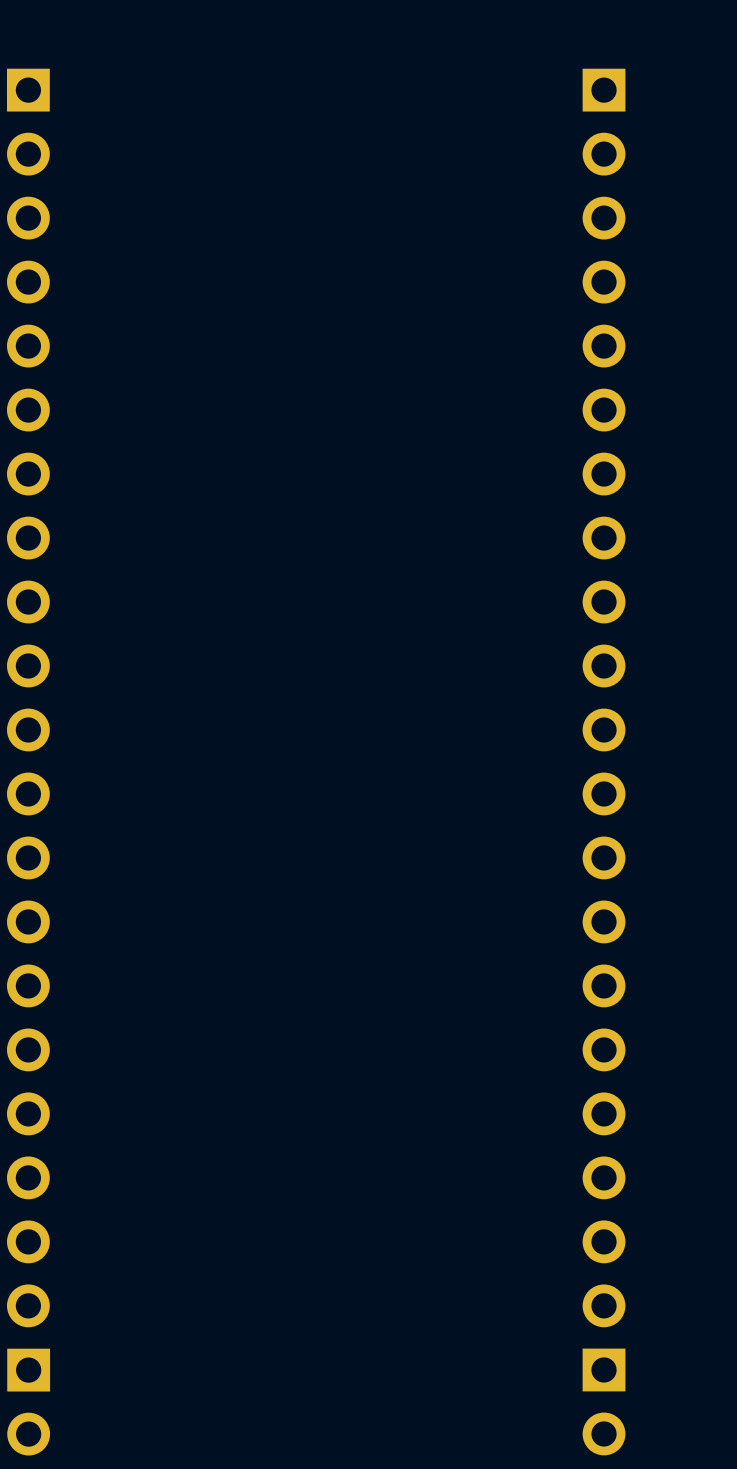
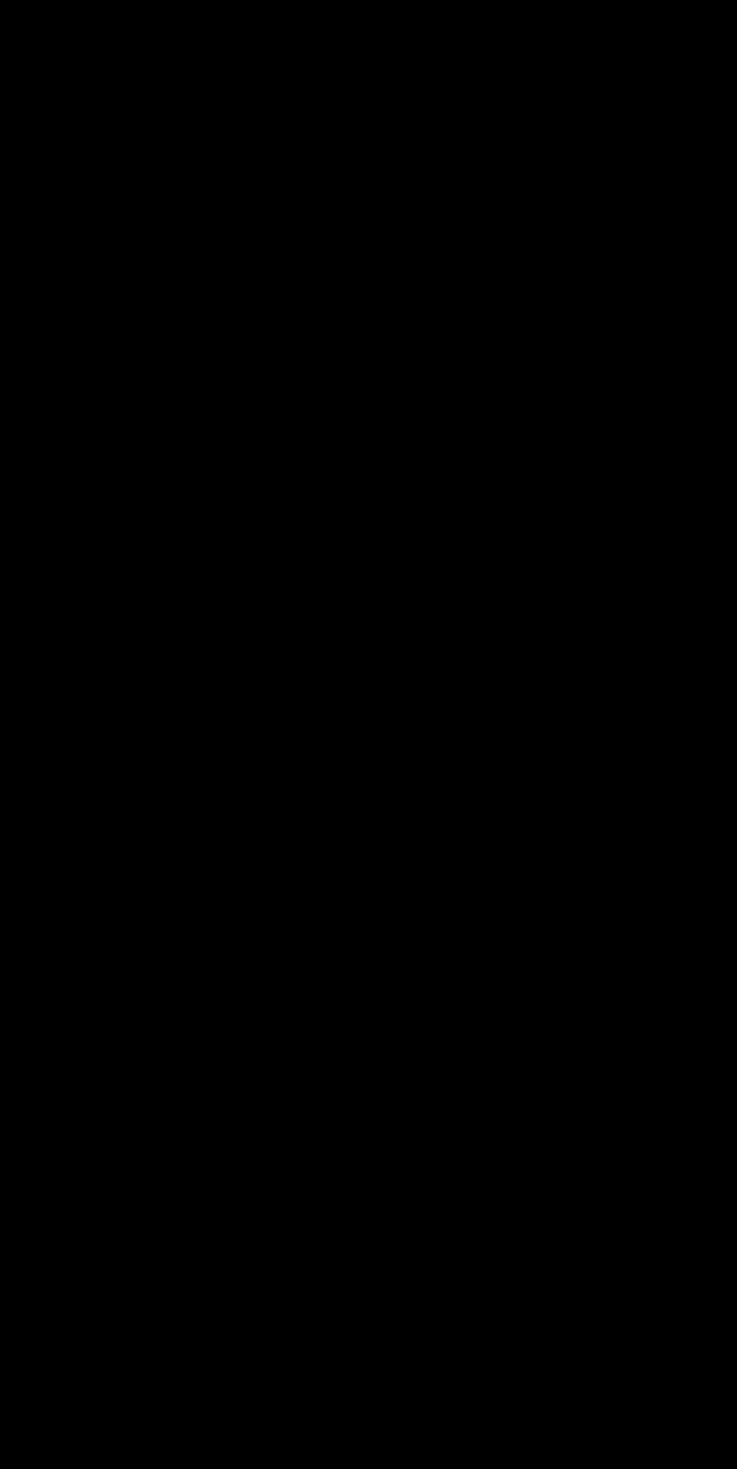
part: (28, 698) -> none
part: (604, 698) -> none
part: (604, 1401) -> none
part: (28, 1402) -> none

